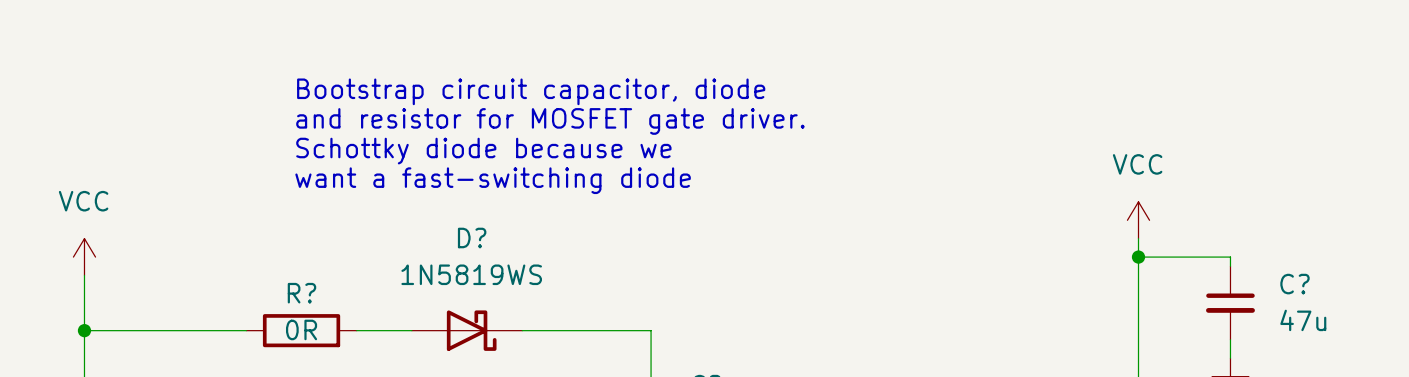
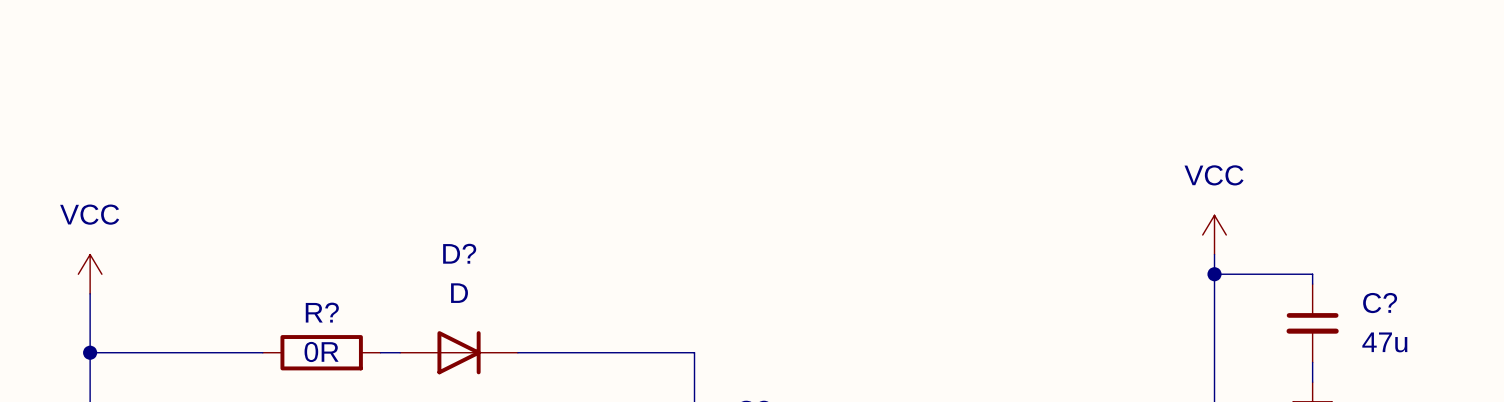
text: Bootstrap circuit capacitor, diode (531, 91) -> none
text: and resistor for MOSFET gate driver. (550, 121) -> none
text: Schottky diode because we (483, 151) -> none
text: want a fast-switching diode (493, 180) -> none
D?: none -> D (459, 352)
D?: 1N5819WS (467, 330) -> none

